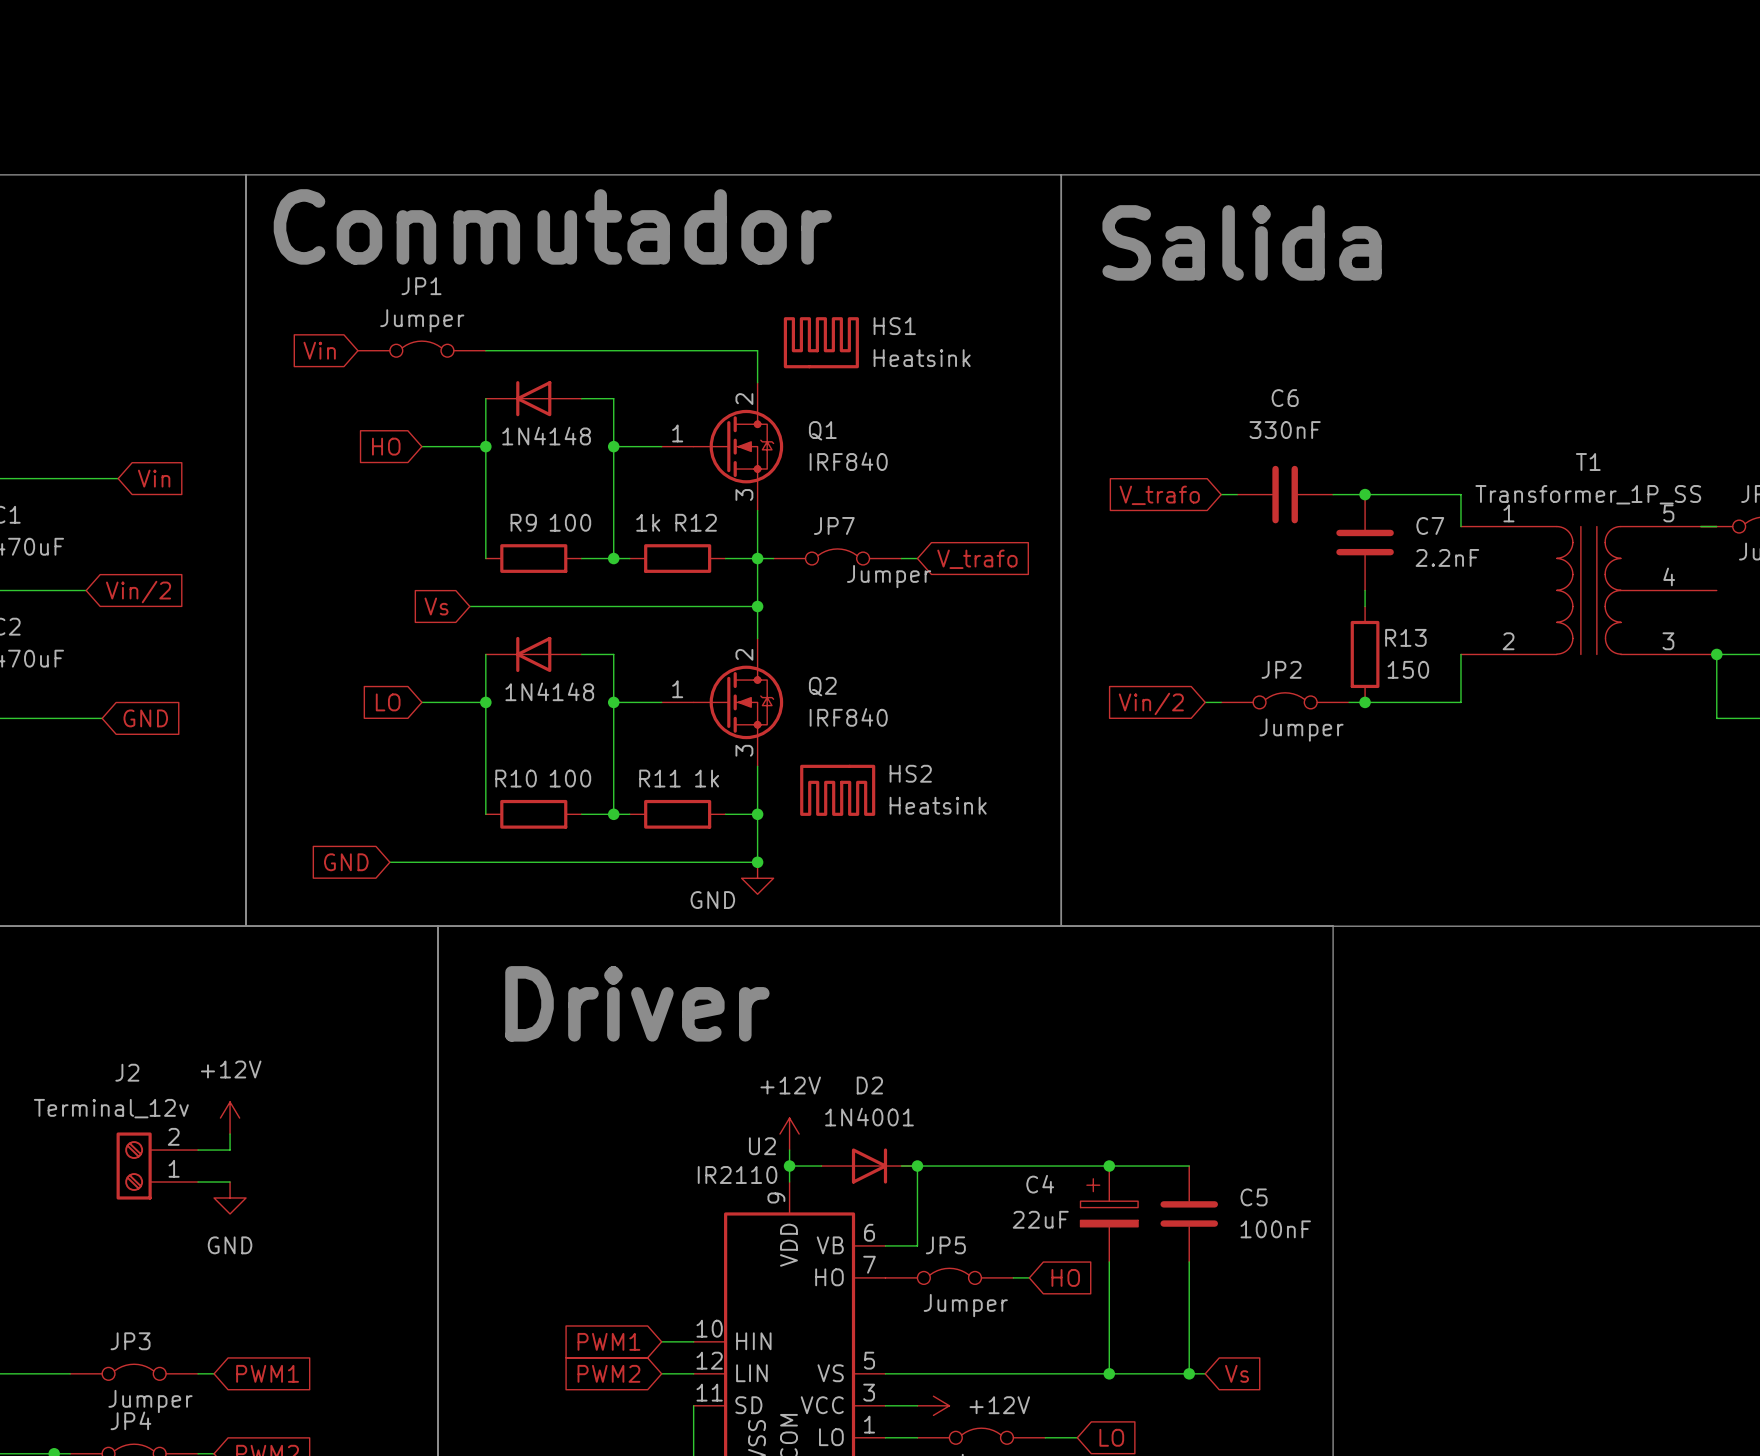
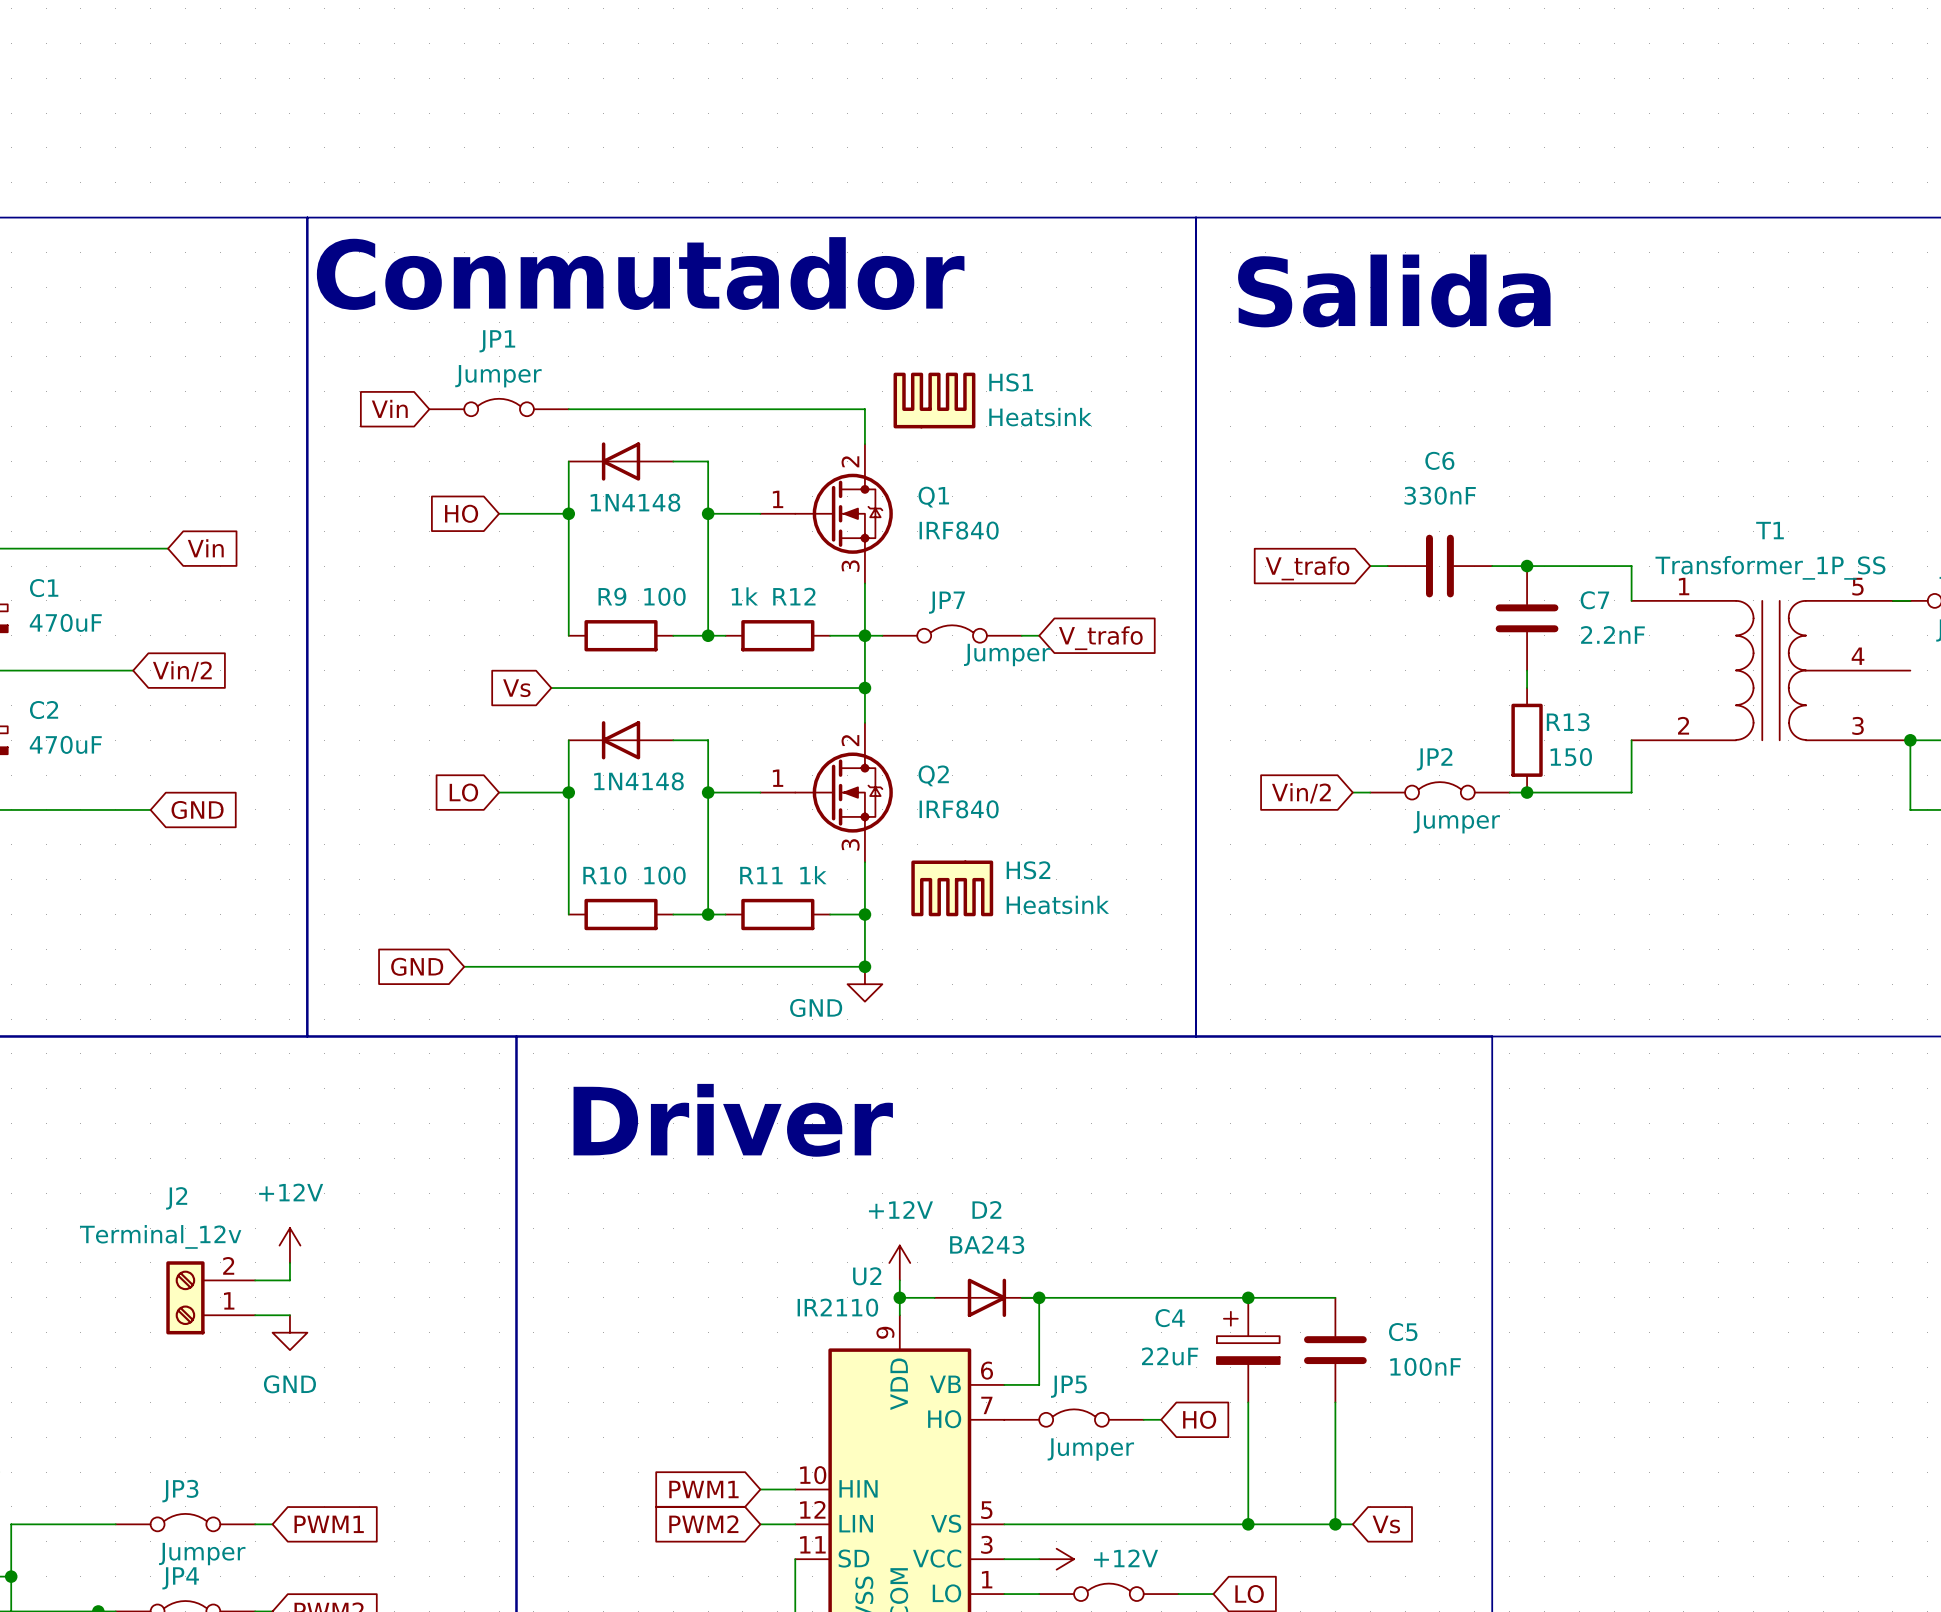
D2 value: 1N4001 (869, 1117) -> BA243 (987, 1244)

